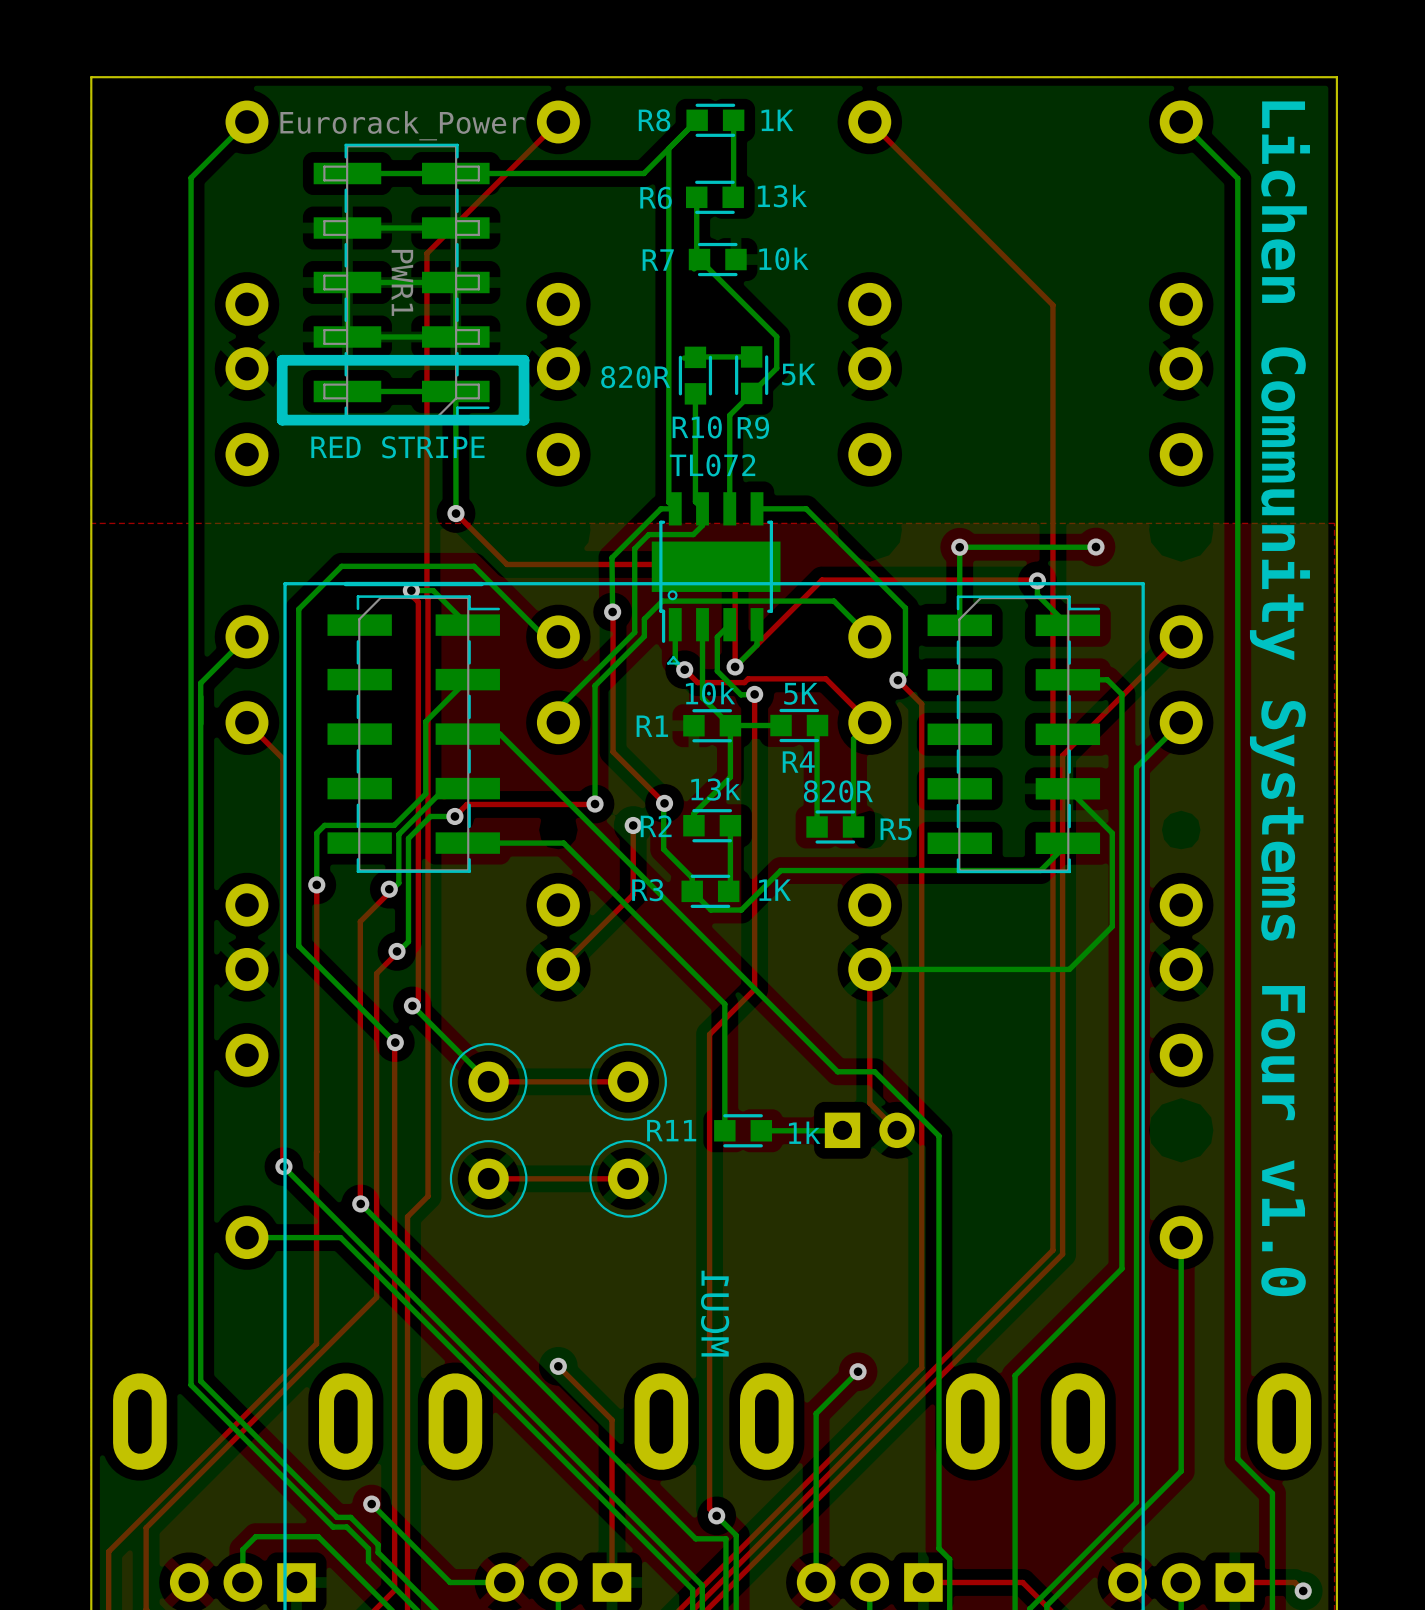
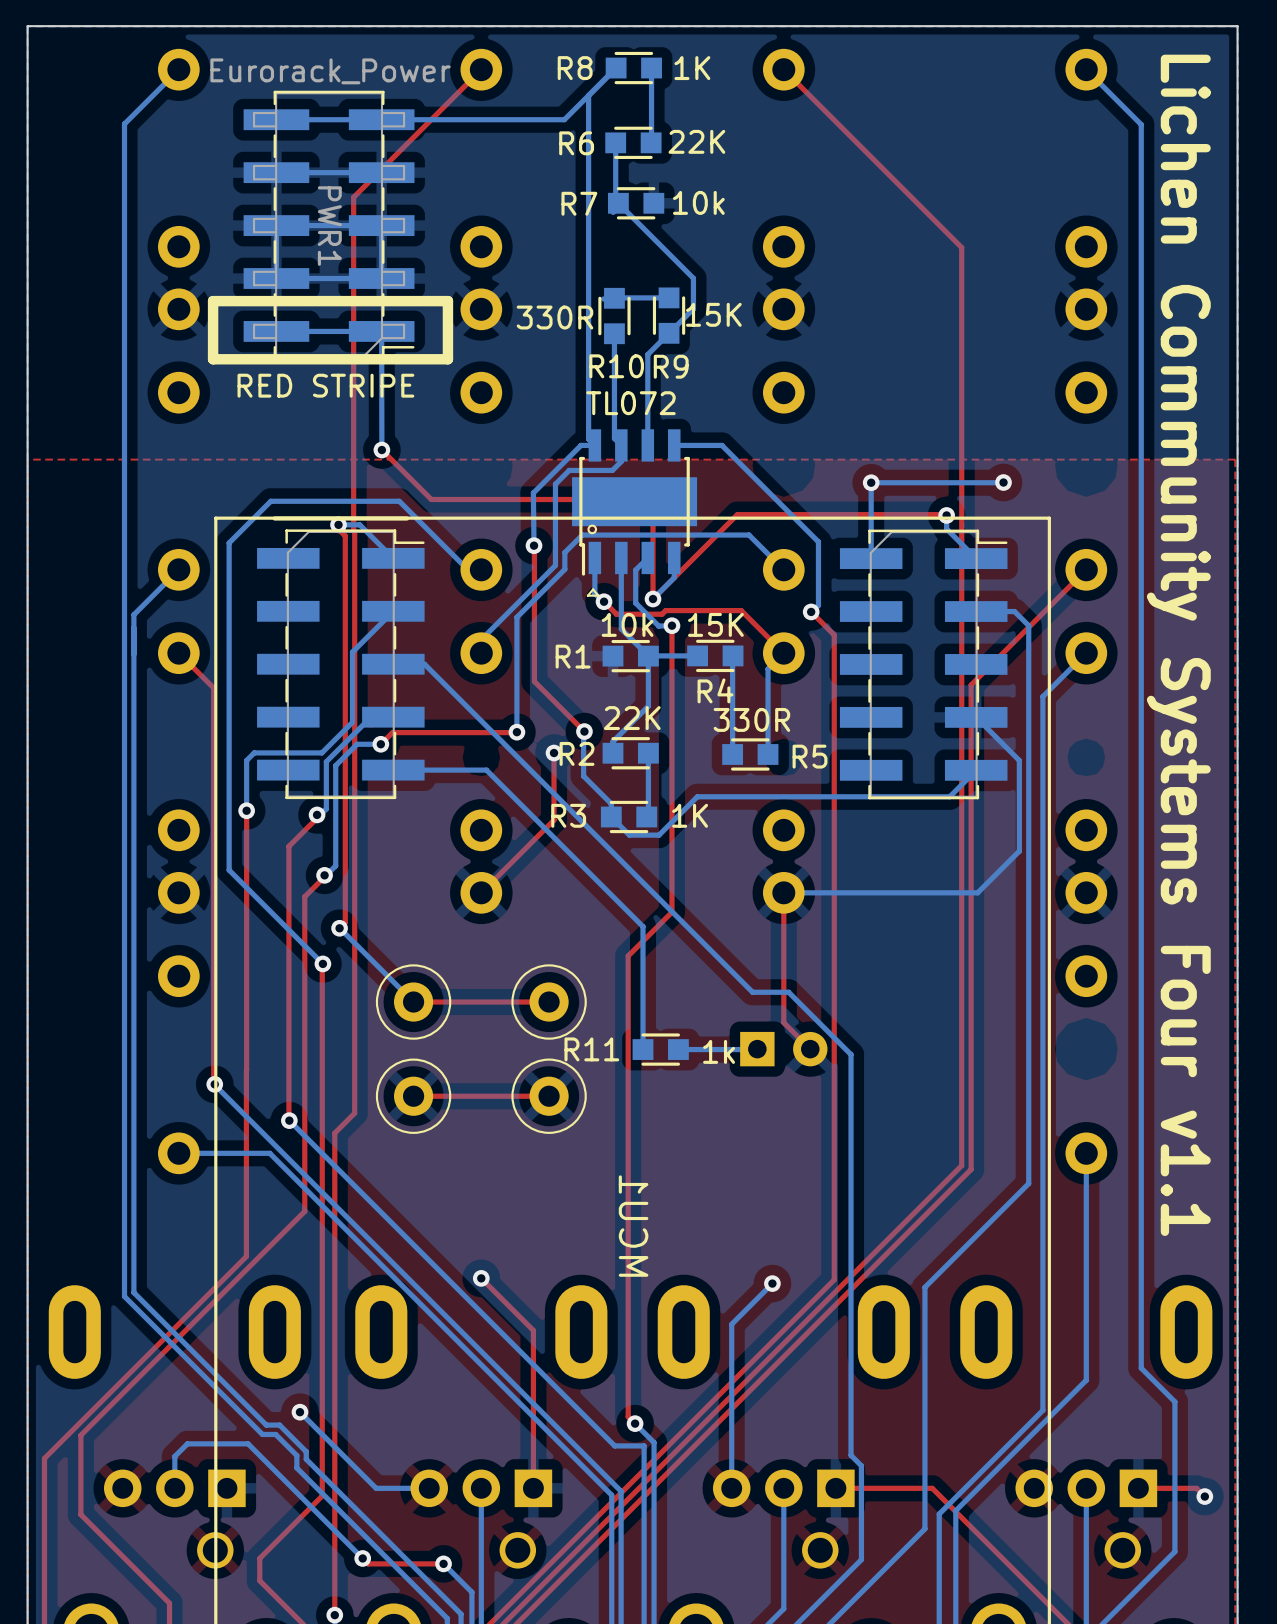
R7 value: 13k (782, 196) -> 22K (696, 141)
R9 value: 5K (798, 374) -> 15K (713, 314)
R10 value: 820R (635, 377) -> 330R (554, 317)
R4 value: 5K (800, 693) -> 15K (715, 624)
text: Lichen Community Systems Four v1.0 (1279, 698) -> Lichen Community Systems Four v1.1 (1178, 645)
R2 value: 13k (715, 789) -> 22K (632, 718)
R5 value: 820R (838, 791) -> 330R (751, 719)

